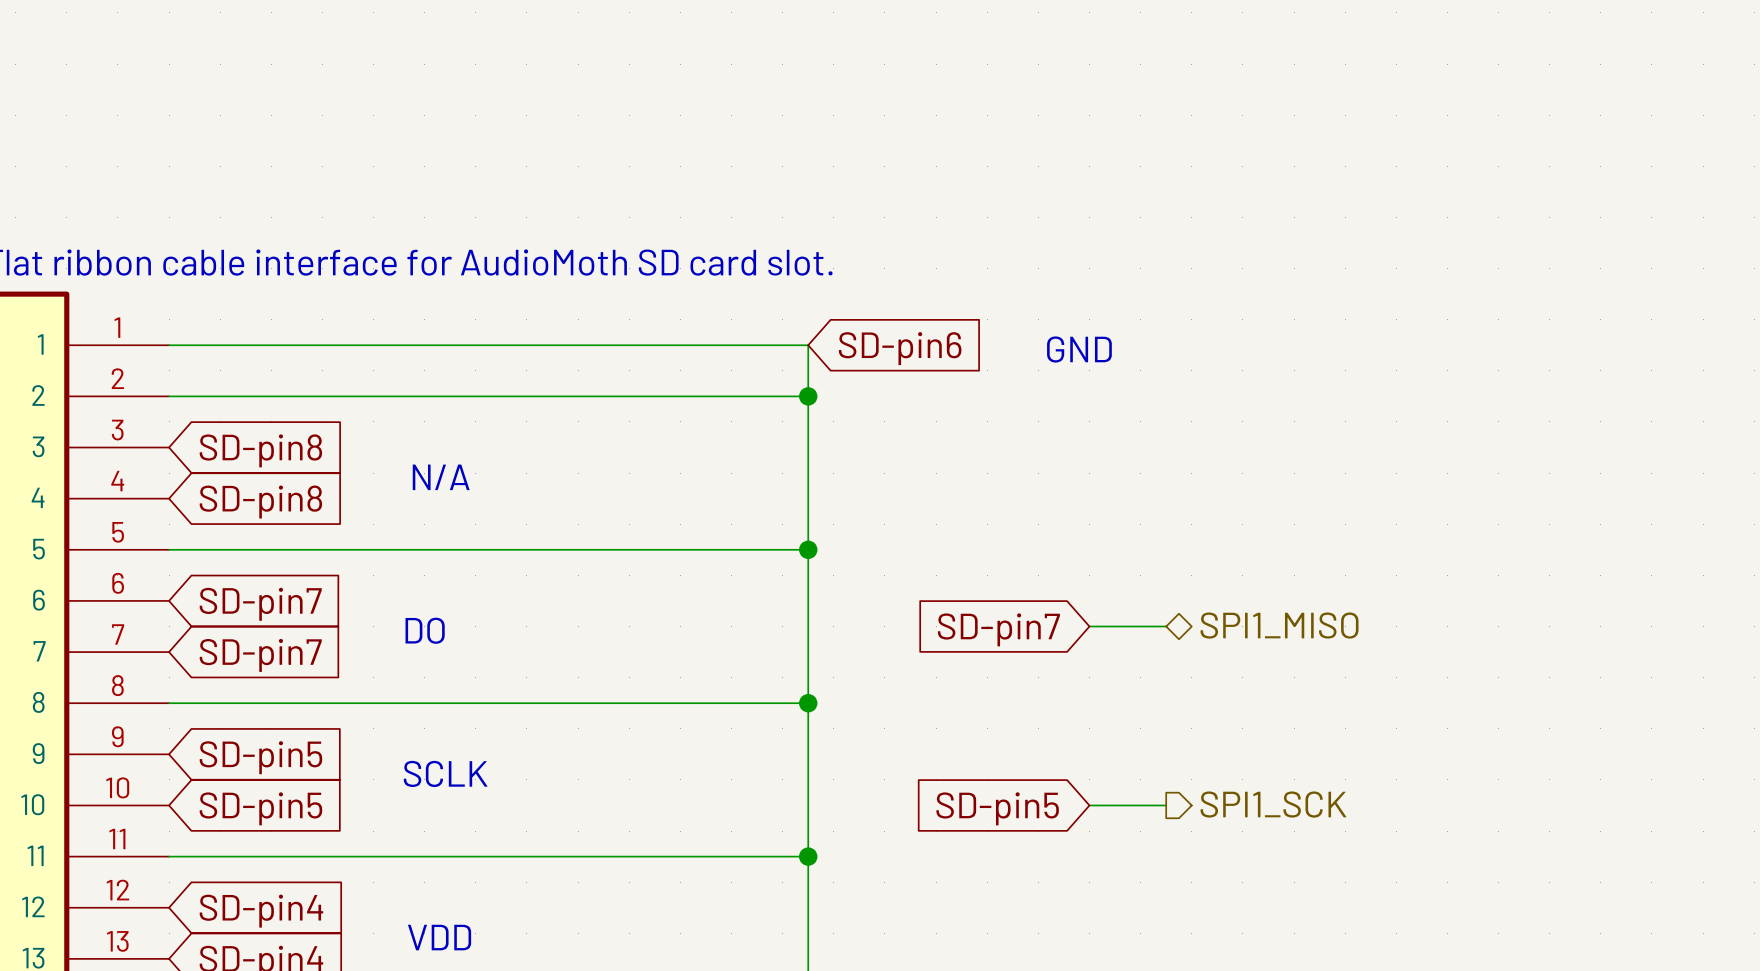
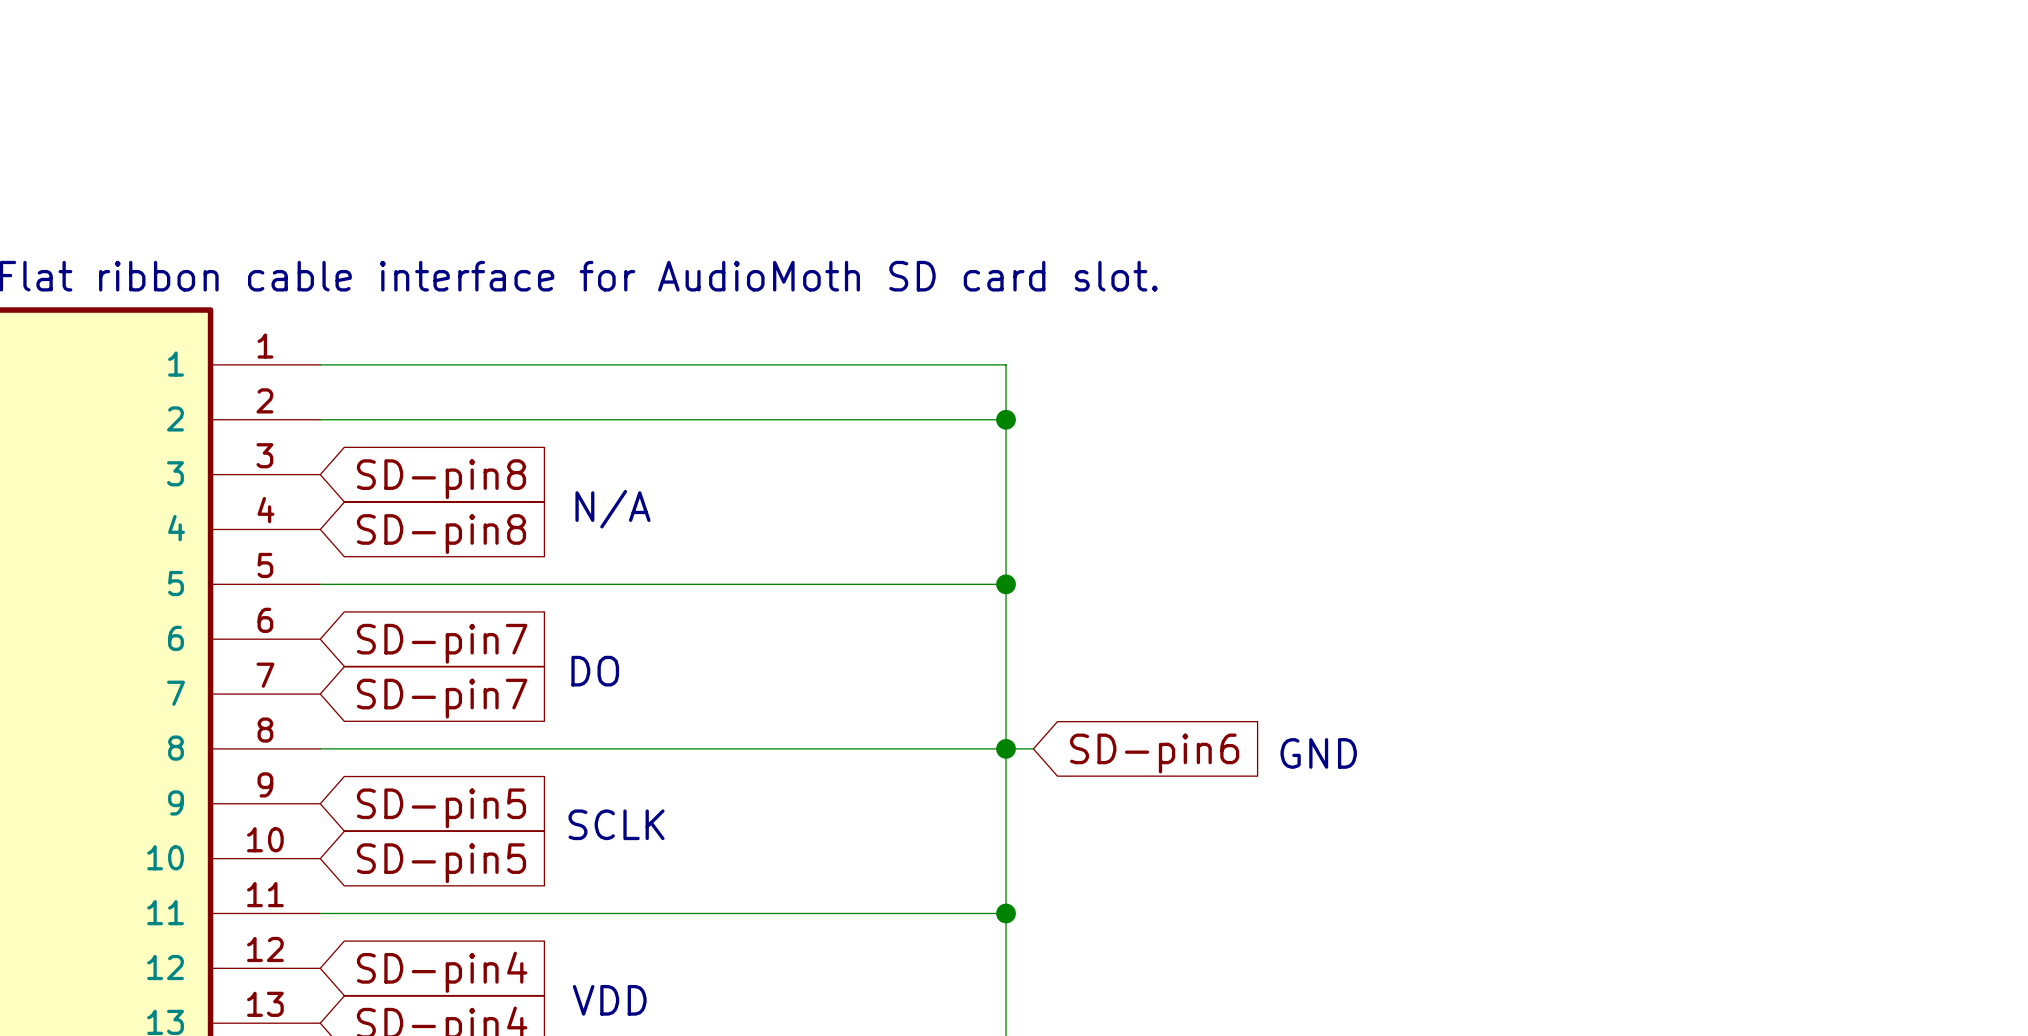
global label position: SD-pin6 (900, 348) -> SD-pin6 (1154, 753)
text position: GND (1079, 349) -> GND (1318, 753)
hierarchical label: SPI1_MISO (1279, 625) -> none
wire: (1089, 626) (1166, 626) -> none
global label: SD-pin7 (998, 629) -> none
wire: none -> (1006, 748) (1033, 748)
hierarchical label: SPI1_SCK (1273, 804) -> none
wire: (1089, 805) (1166, 805) -> none
global label: SD-pin5 (997, 808) -> none

